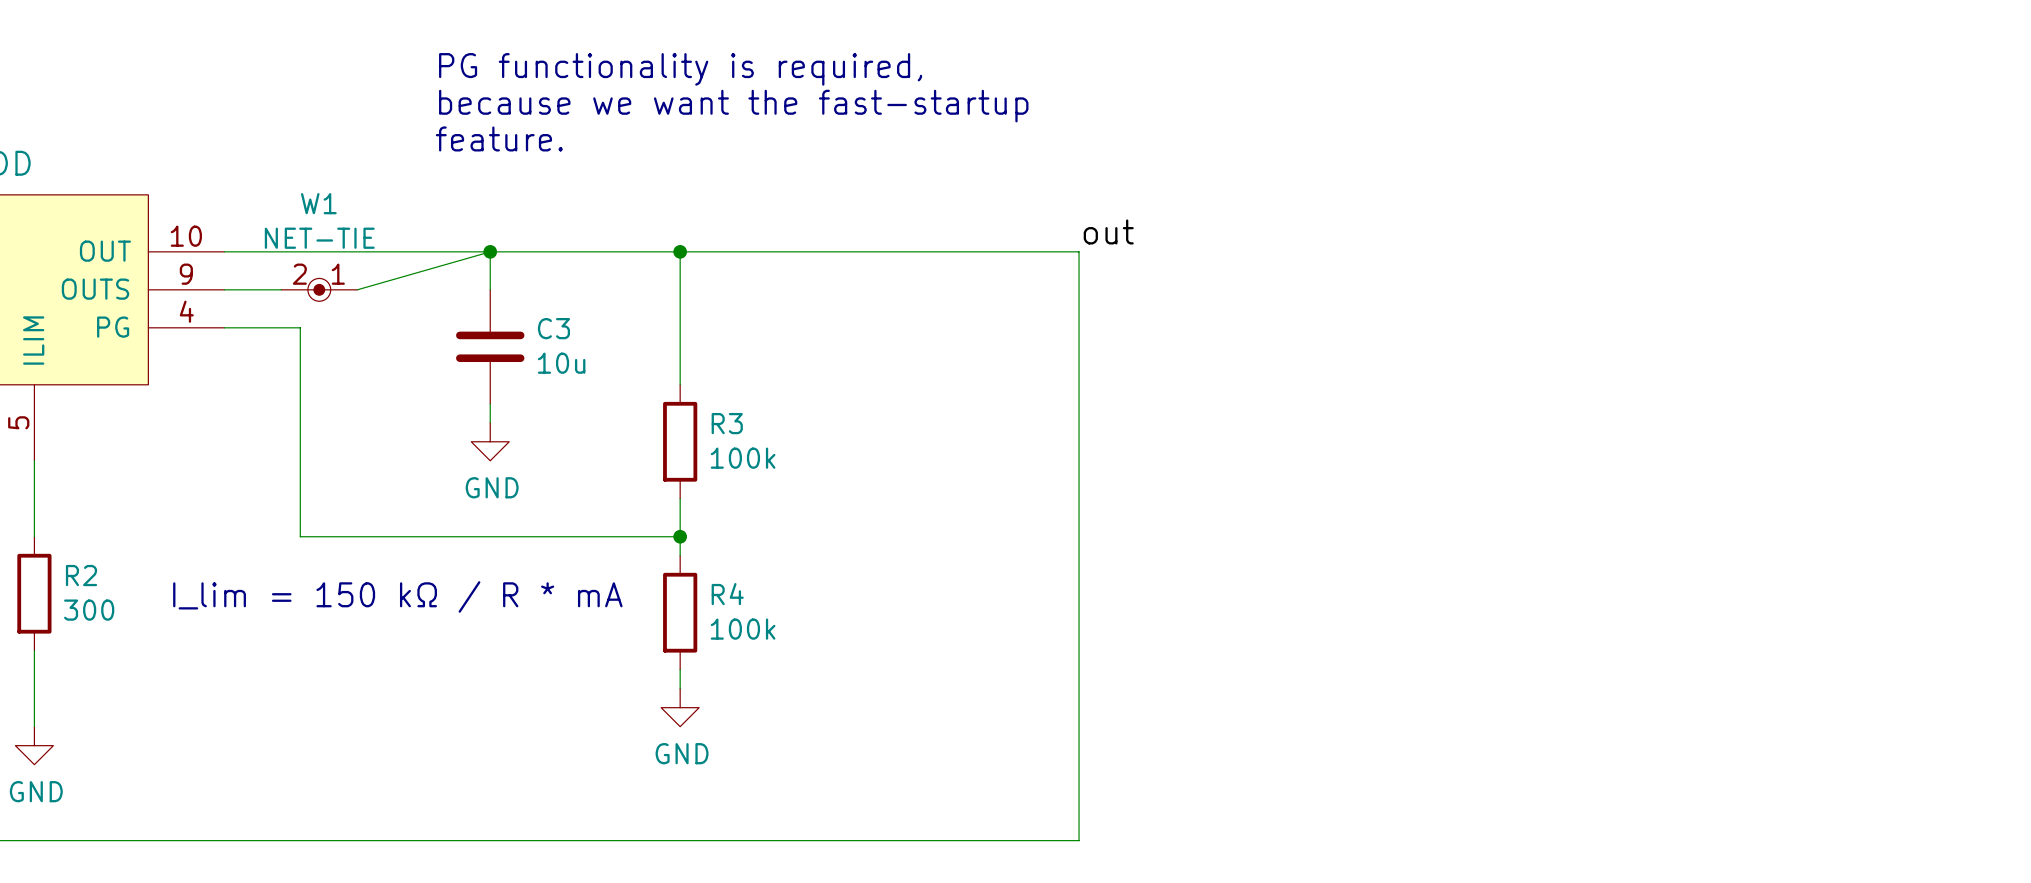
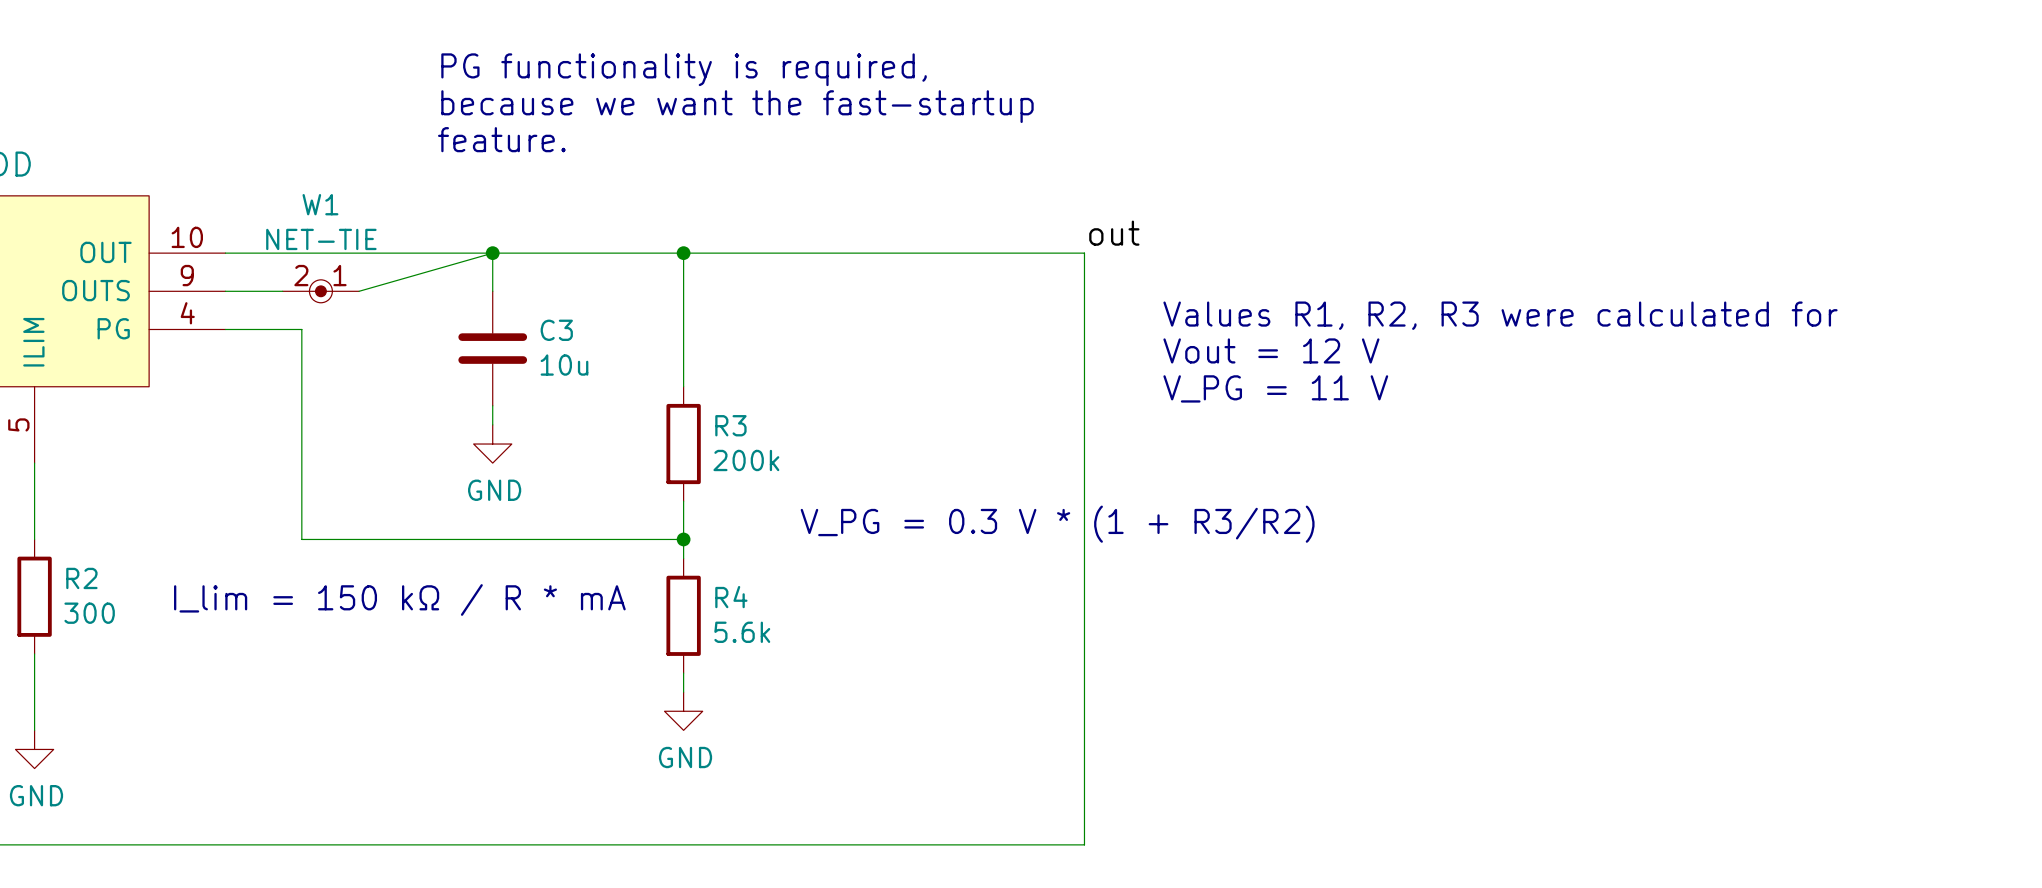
text: none -> Values R1, R2, R3 were calculated for (1500, 315)
text: none -> Vout = 12 V (1271, 350)
text: none -> V_PG = 11 V (1275, 388)
R3 value: 100k (743, 458) -> 200k (746, 460)
text: none -> V_PG = 0.3 V * (1 + R3/R2) (1057, 524)
R4 value: 100k (743, 629) -> 5.6k (742, 632)

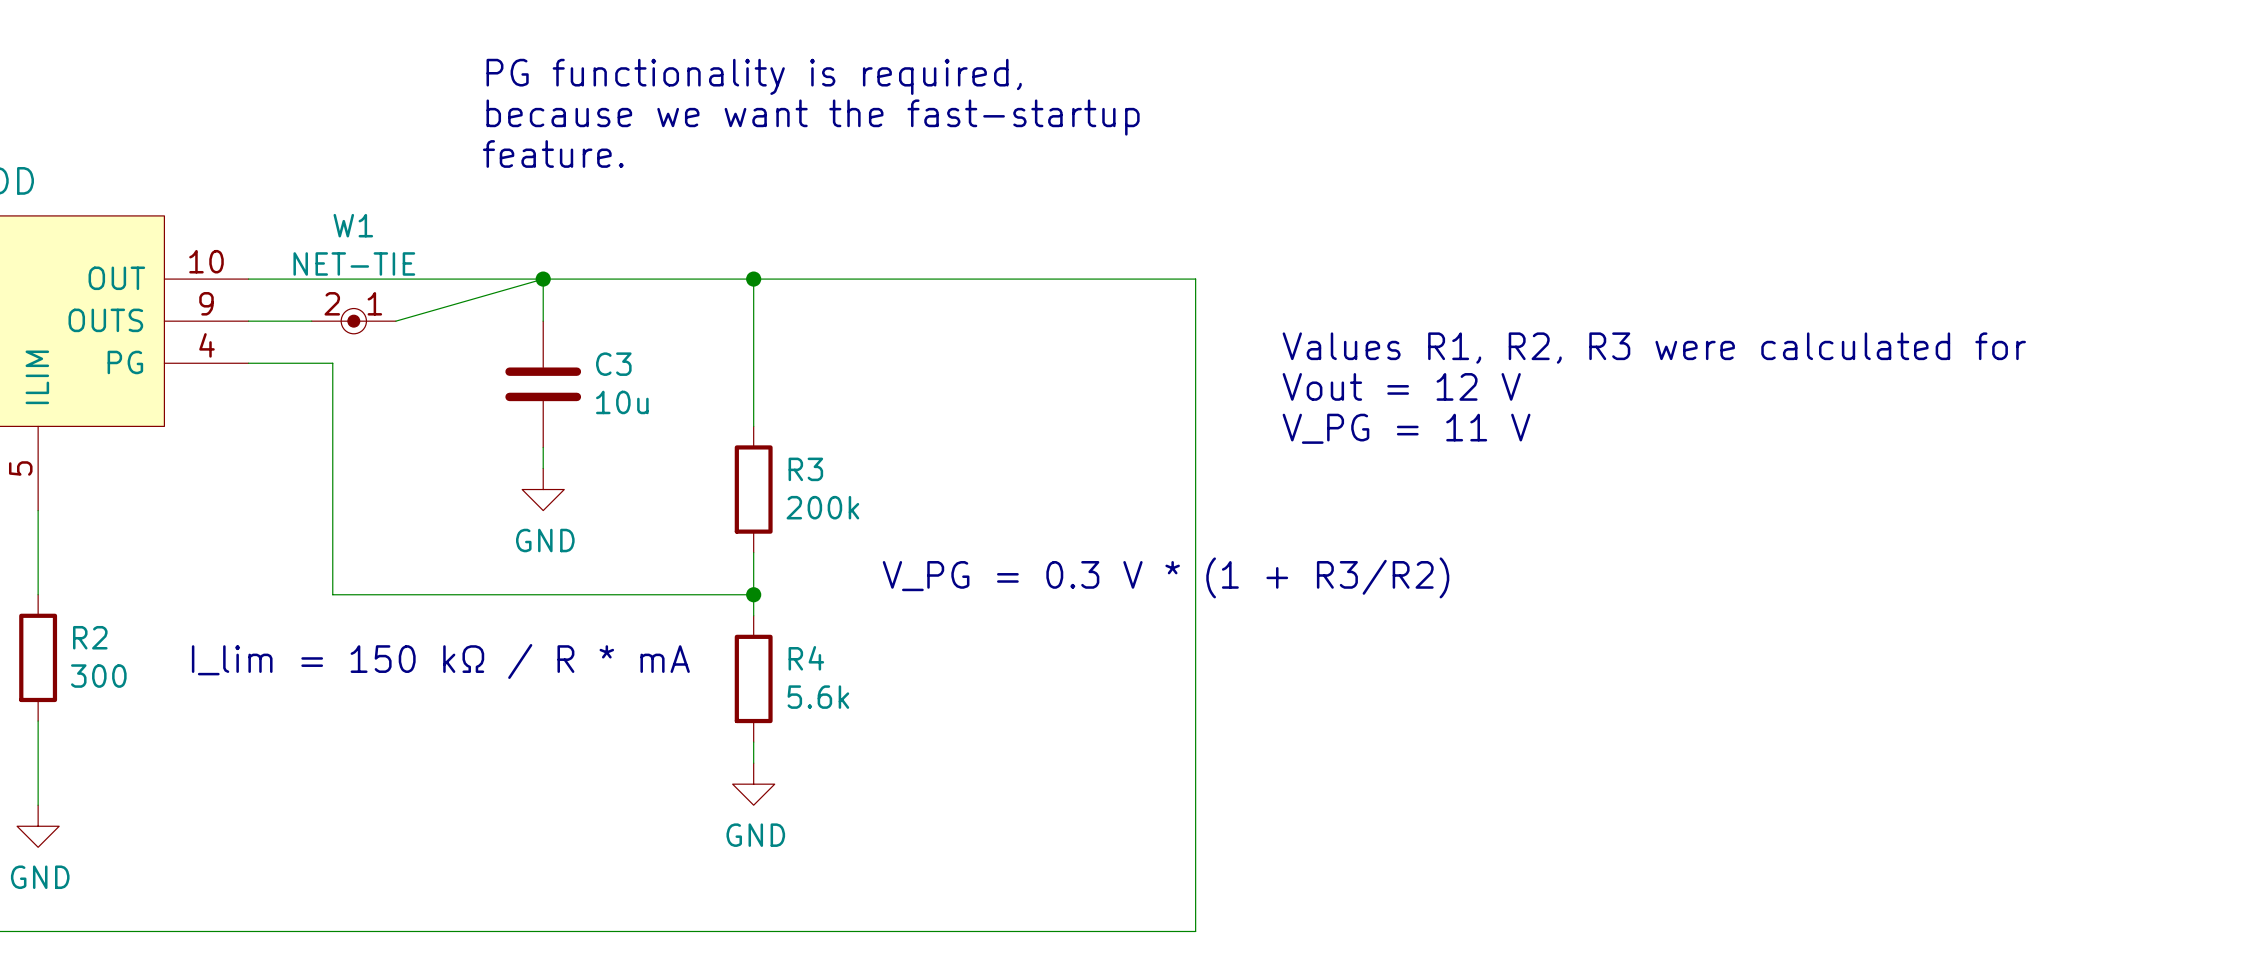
label: out (1114, 233) -> none

